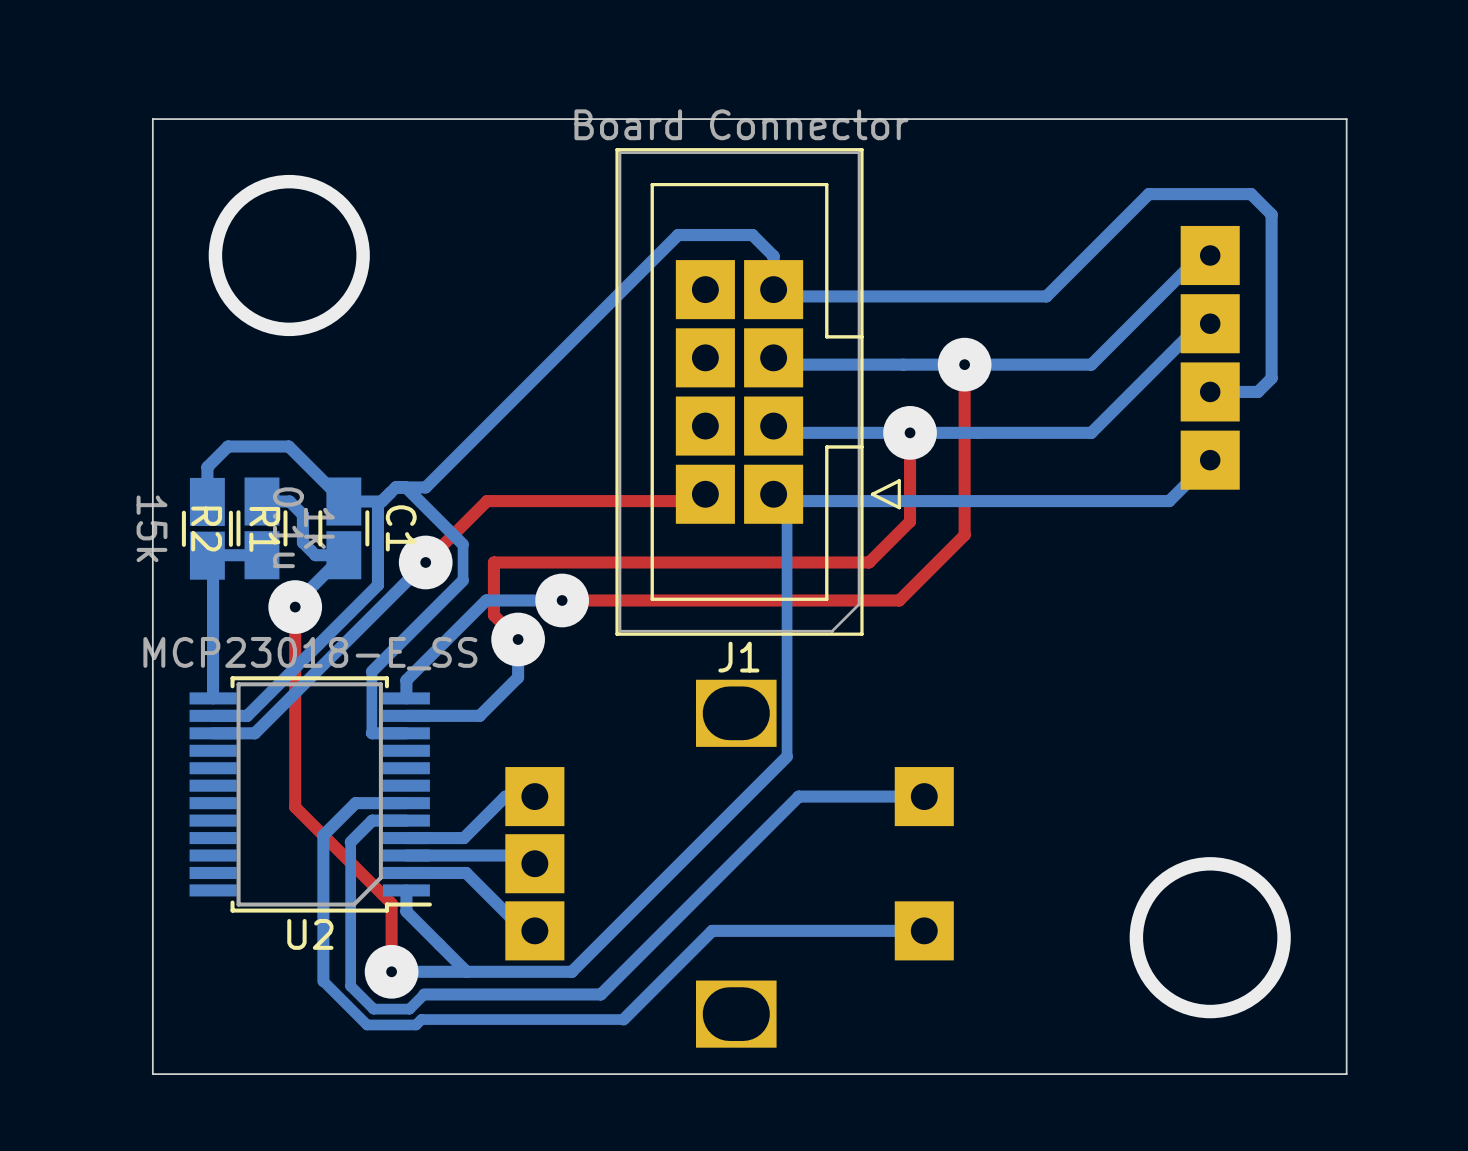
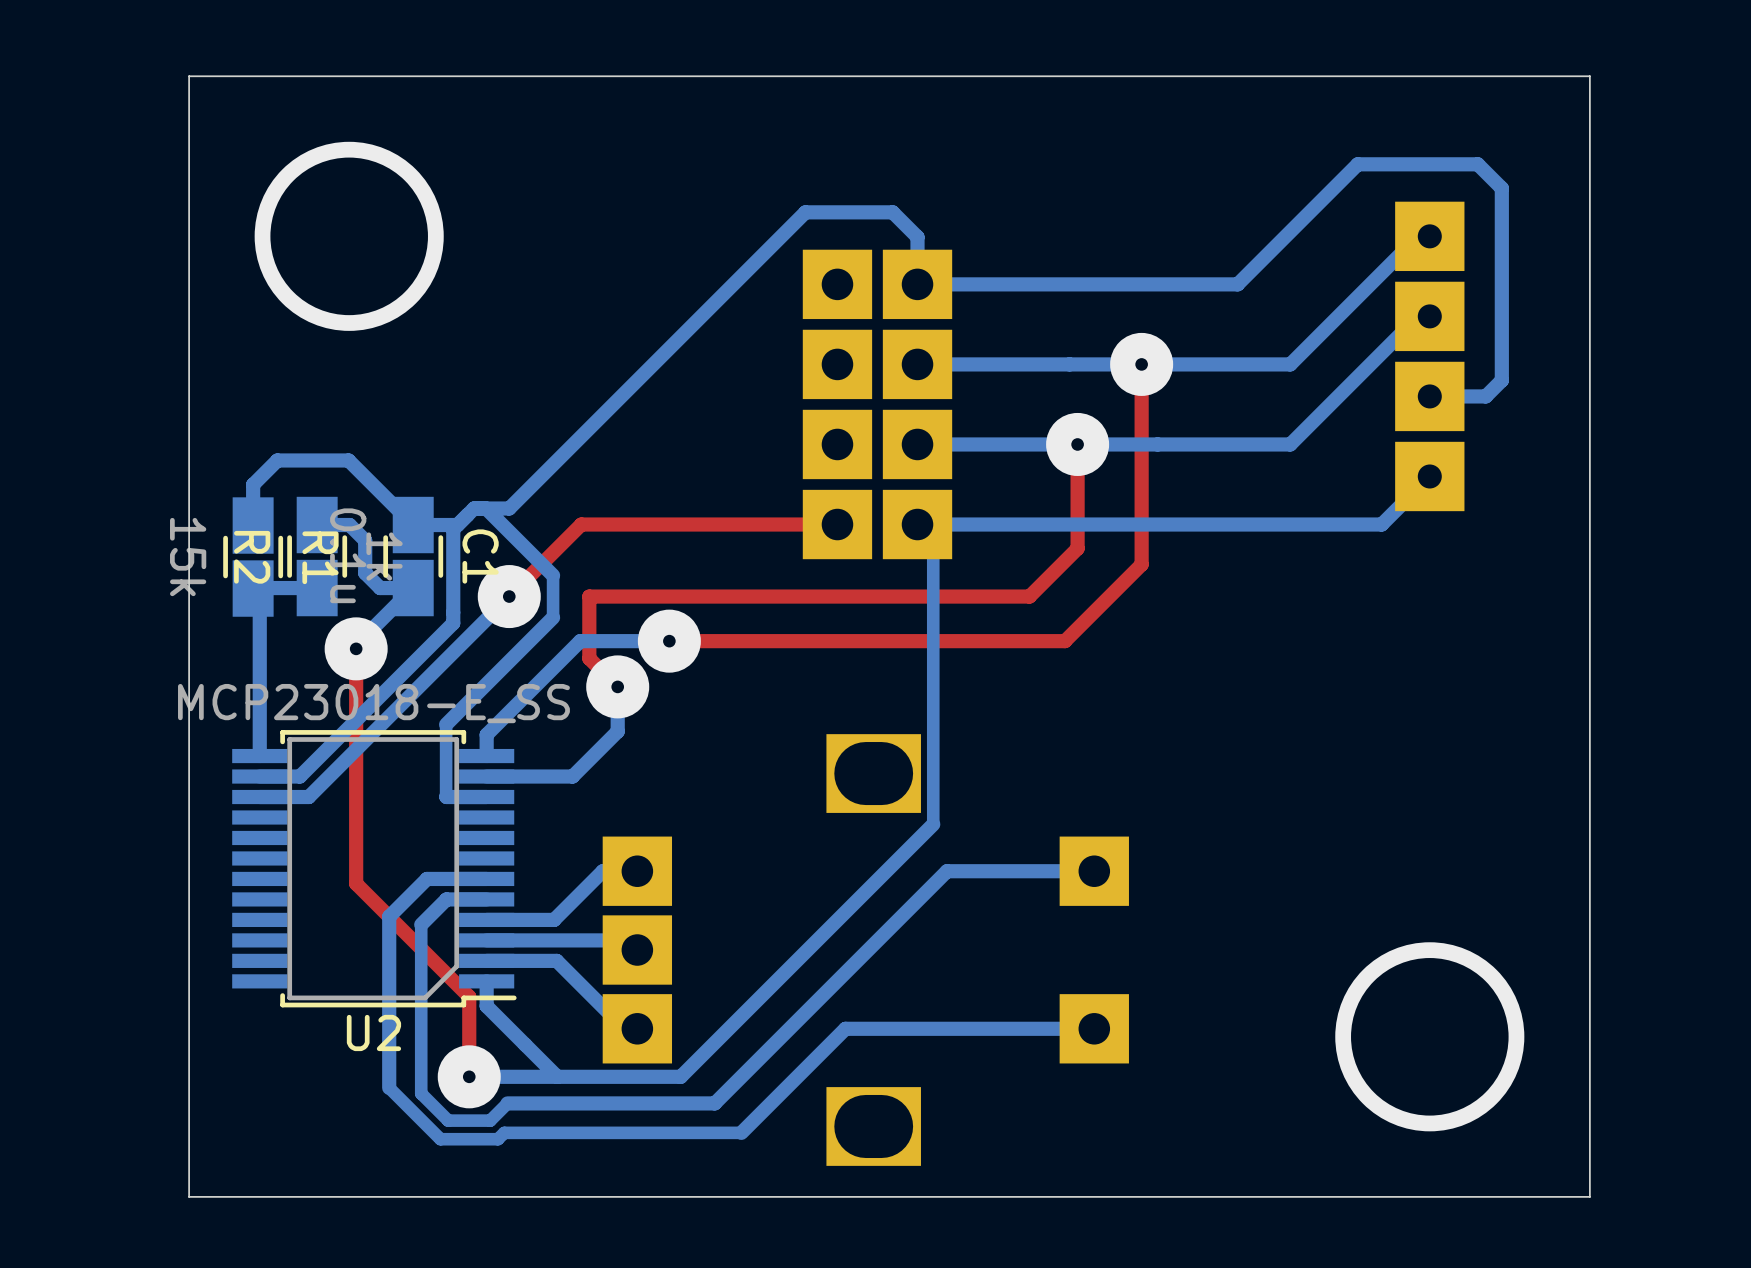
J1 side: bottom (758, 391) -> top (877, 404)

